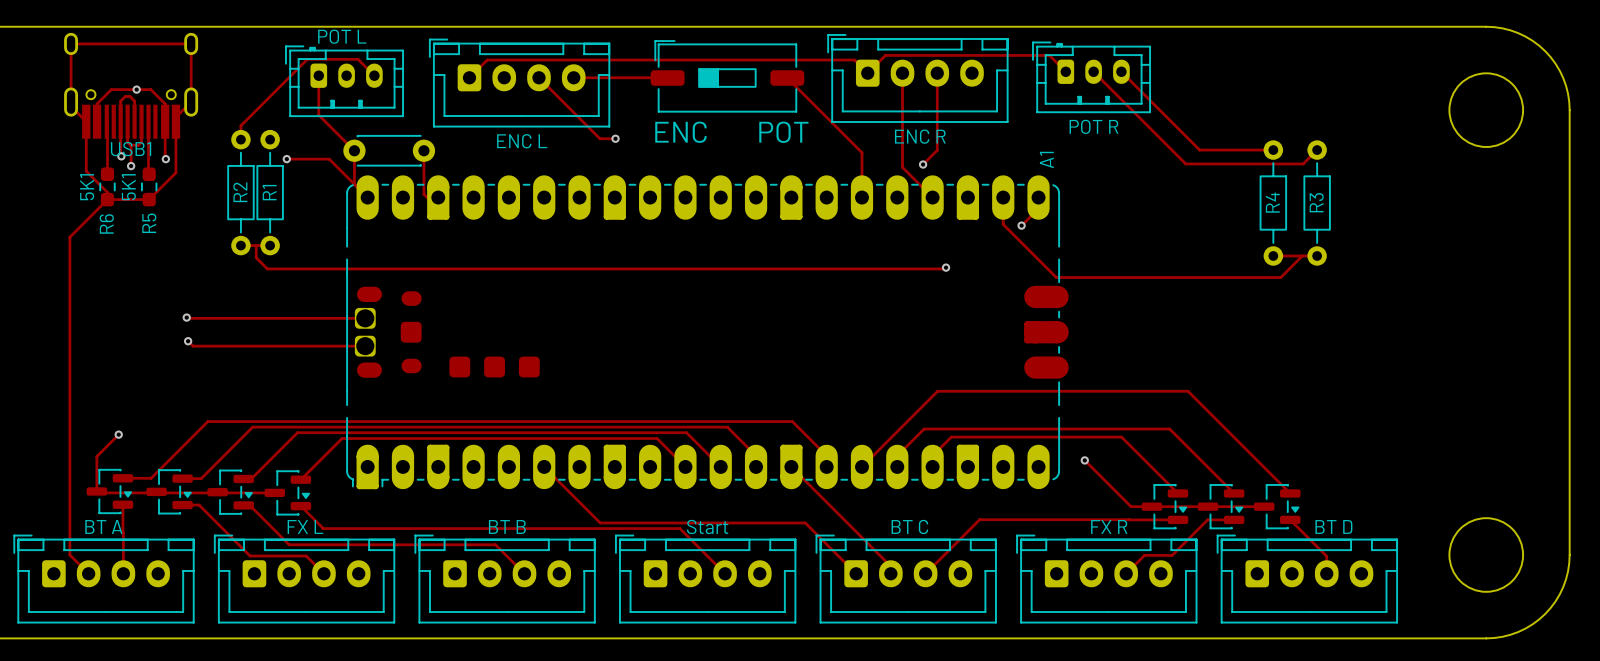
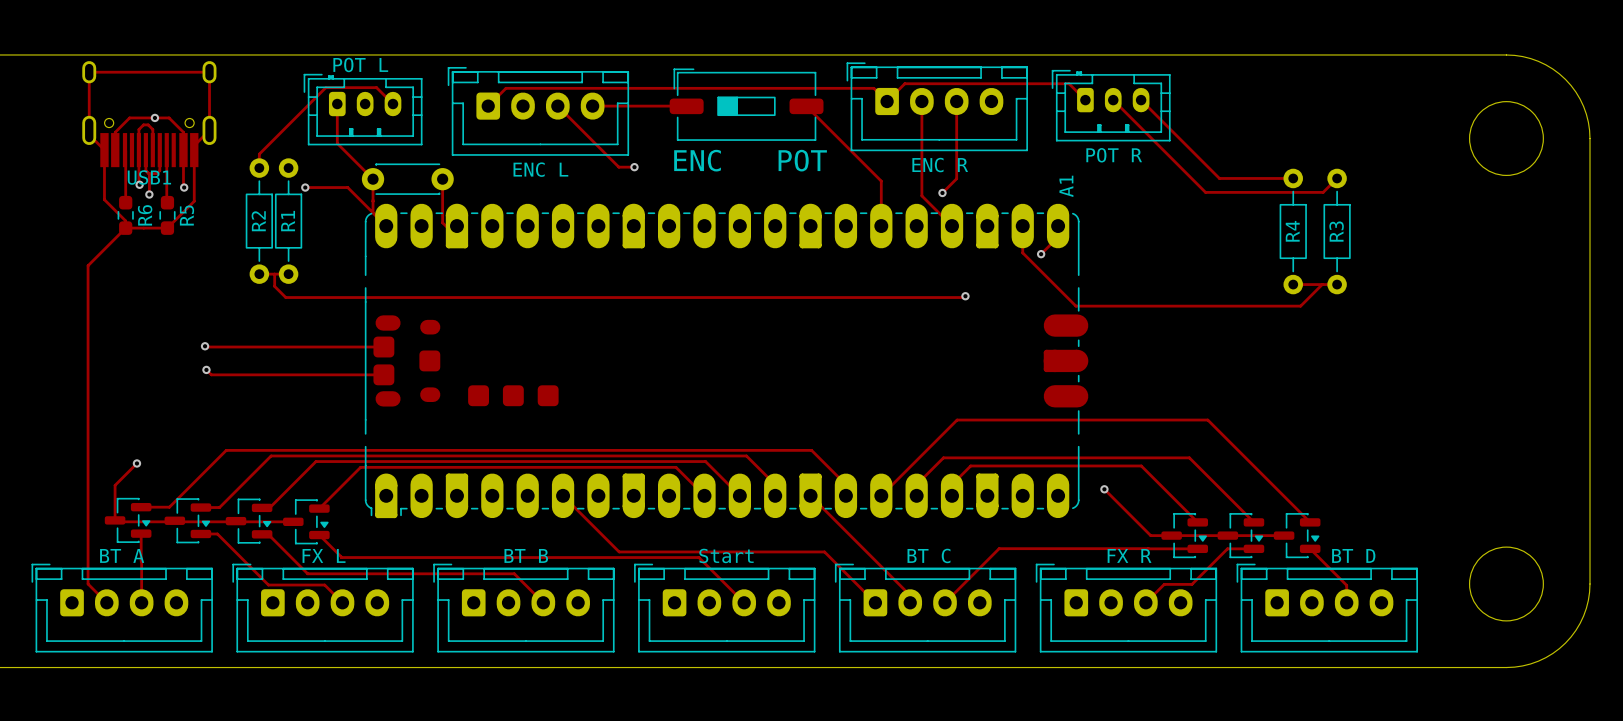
A1 footprint: [346, 175, 1069, 490] -> [364, 203, 1089, 519]
R6 value: 5K1 (87, 187) -> none
R5 value: 5K1 (128, 187) -> none
R6 name position: R6 (106, 223) -> R6 (145, 215)
R5 name position: R5 (149, 223) -> R5 (186, 215)

